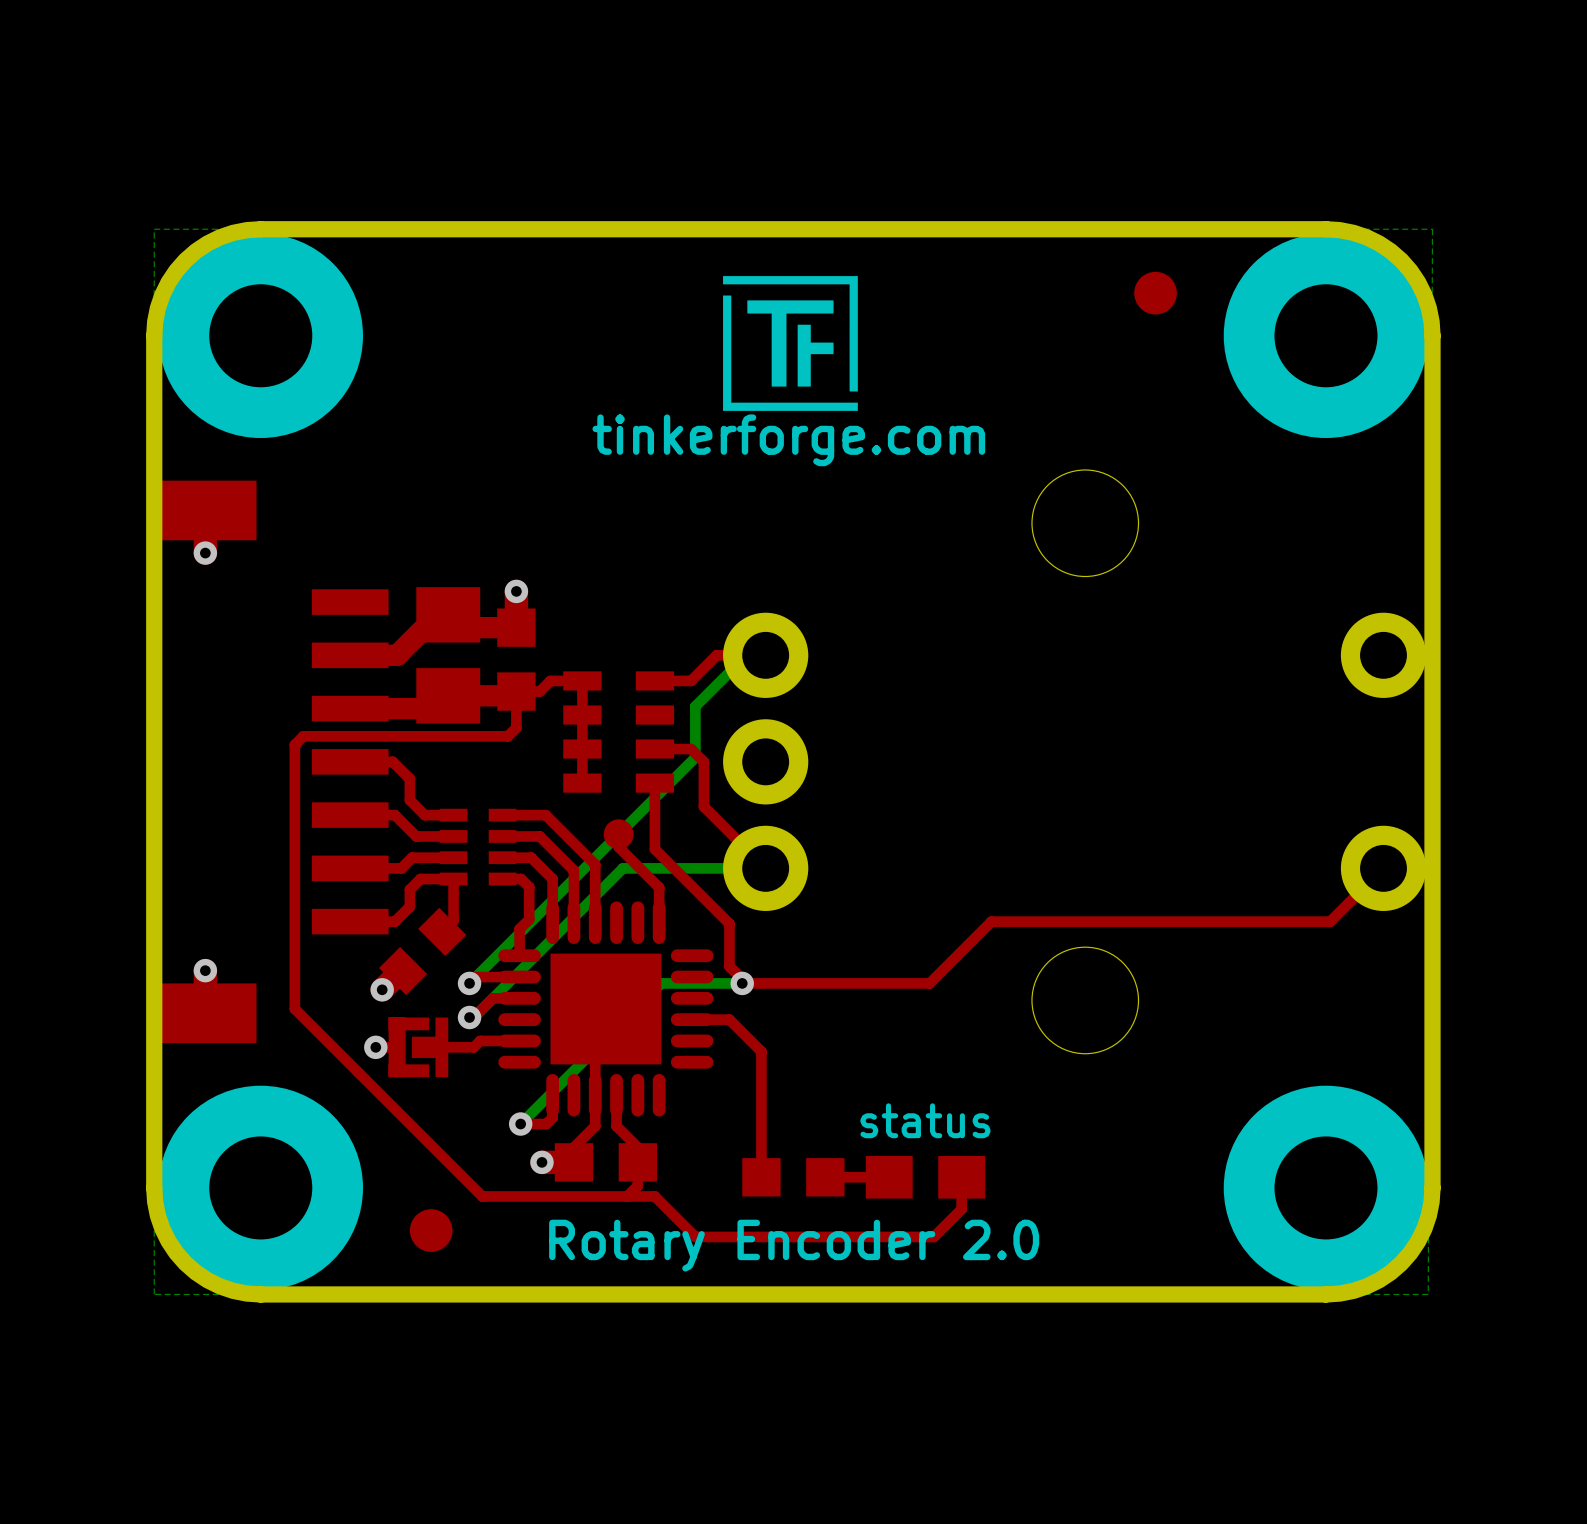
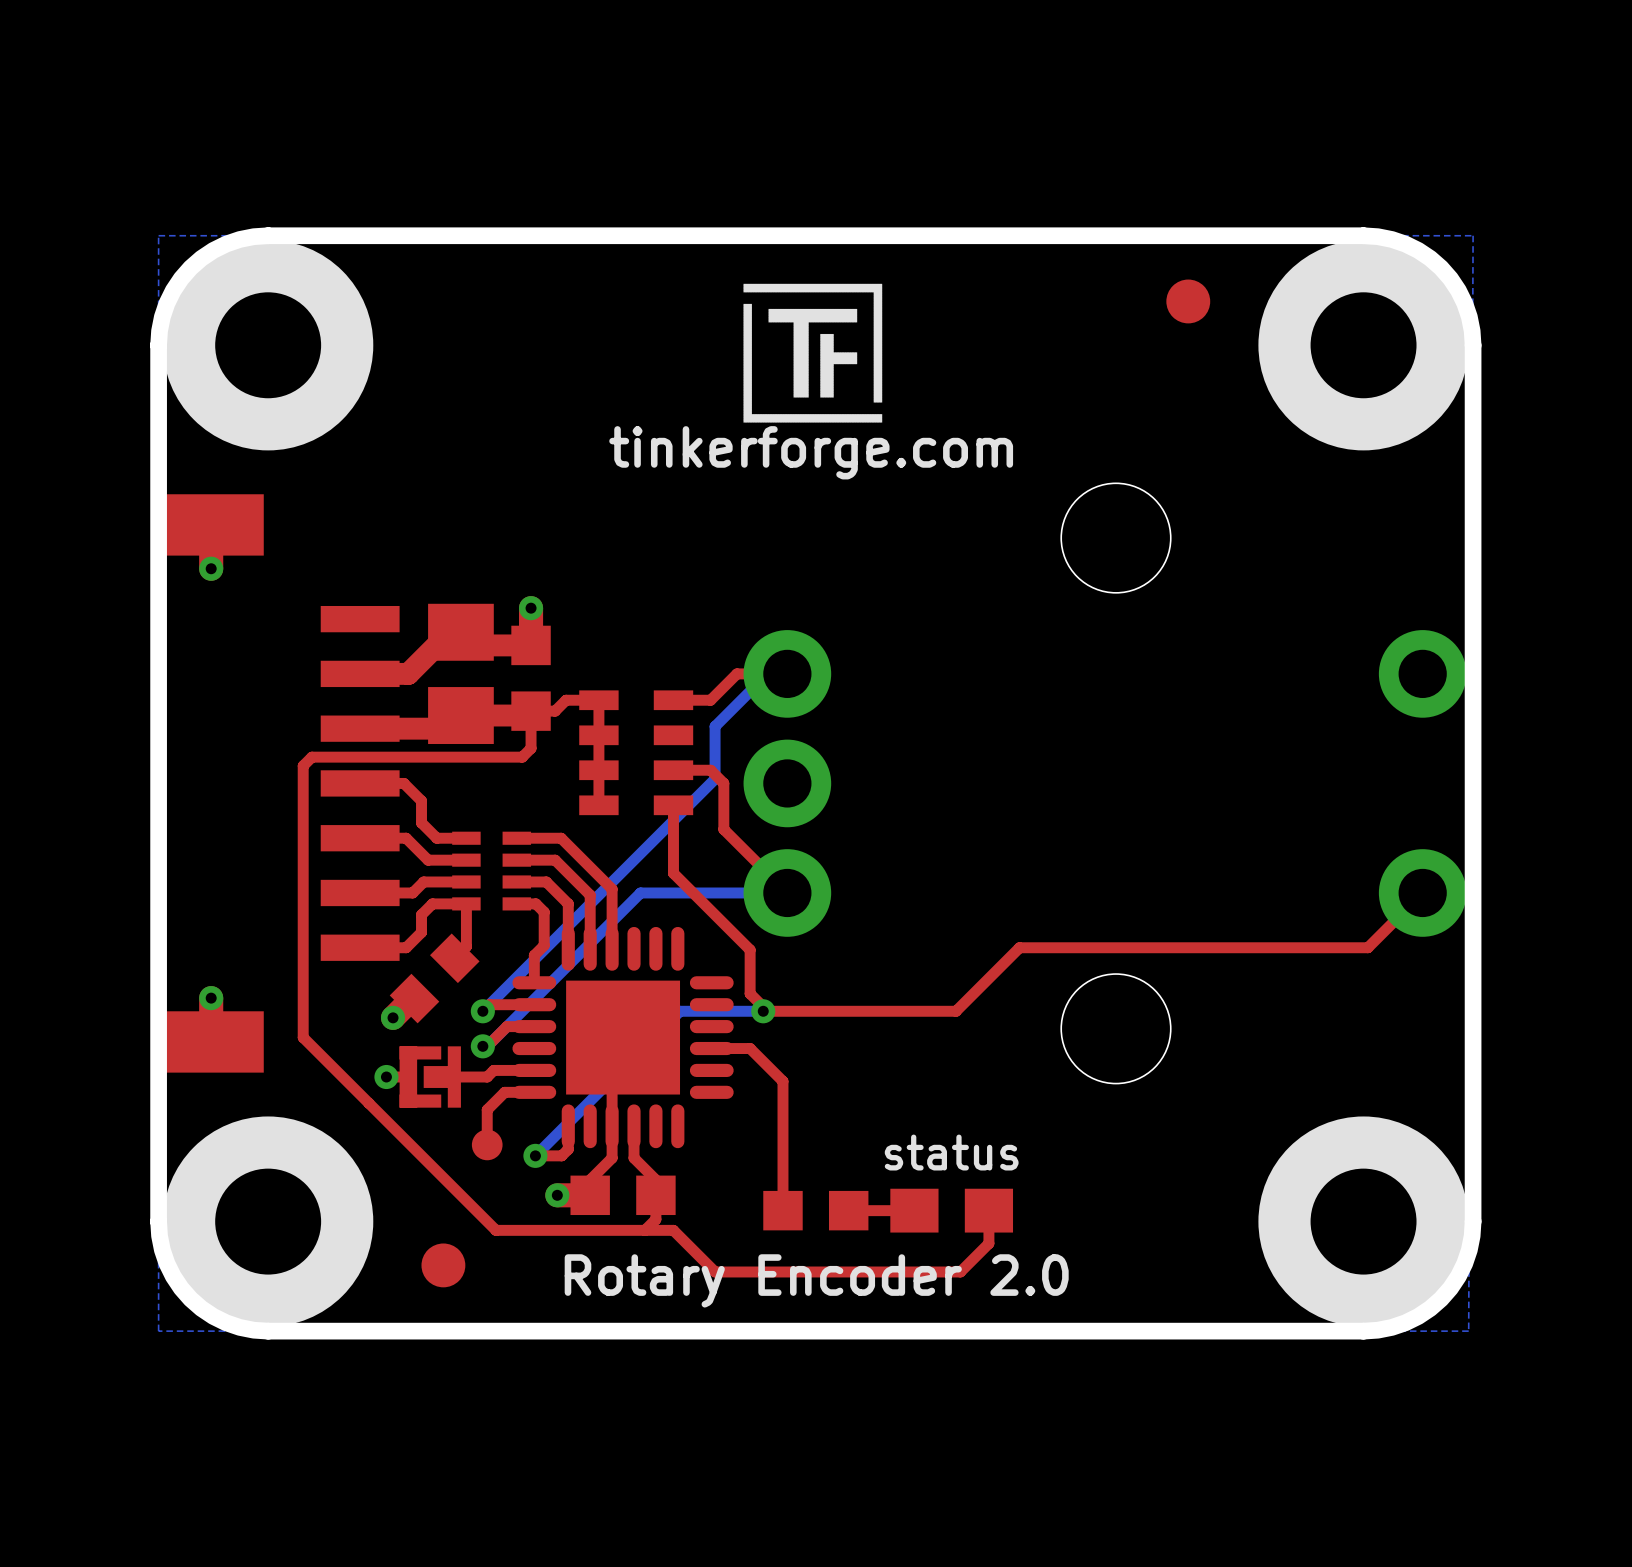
top track: (618, 834) (618, 847) (659, 887) (659, 922) -> none
part position: (618, 834) -> (487, 1144)
top track: none -> (534, 1092) (504, 1092) (487, 1109) (487, 1144)

